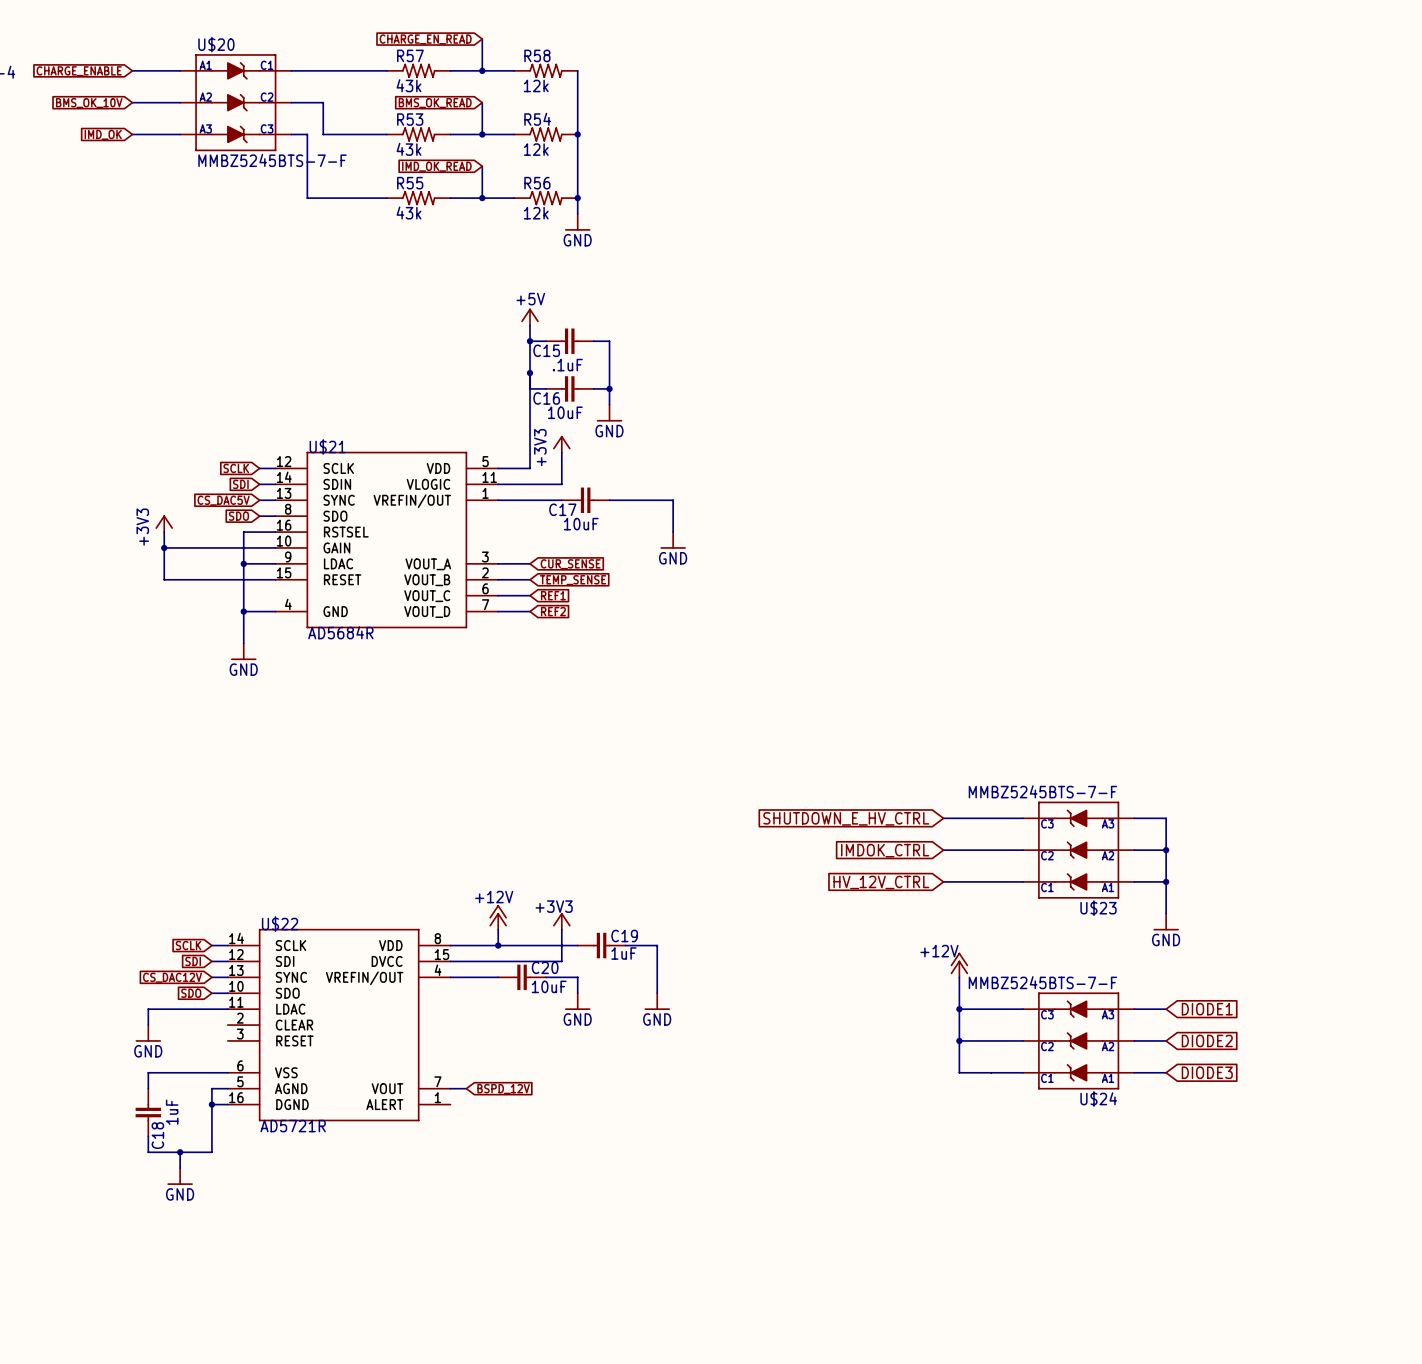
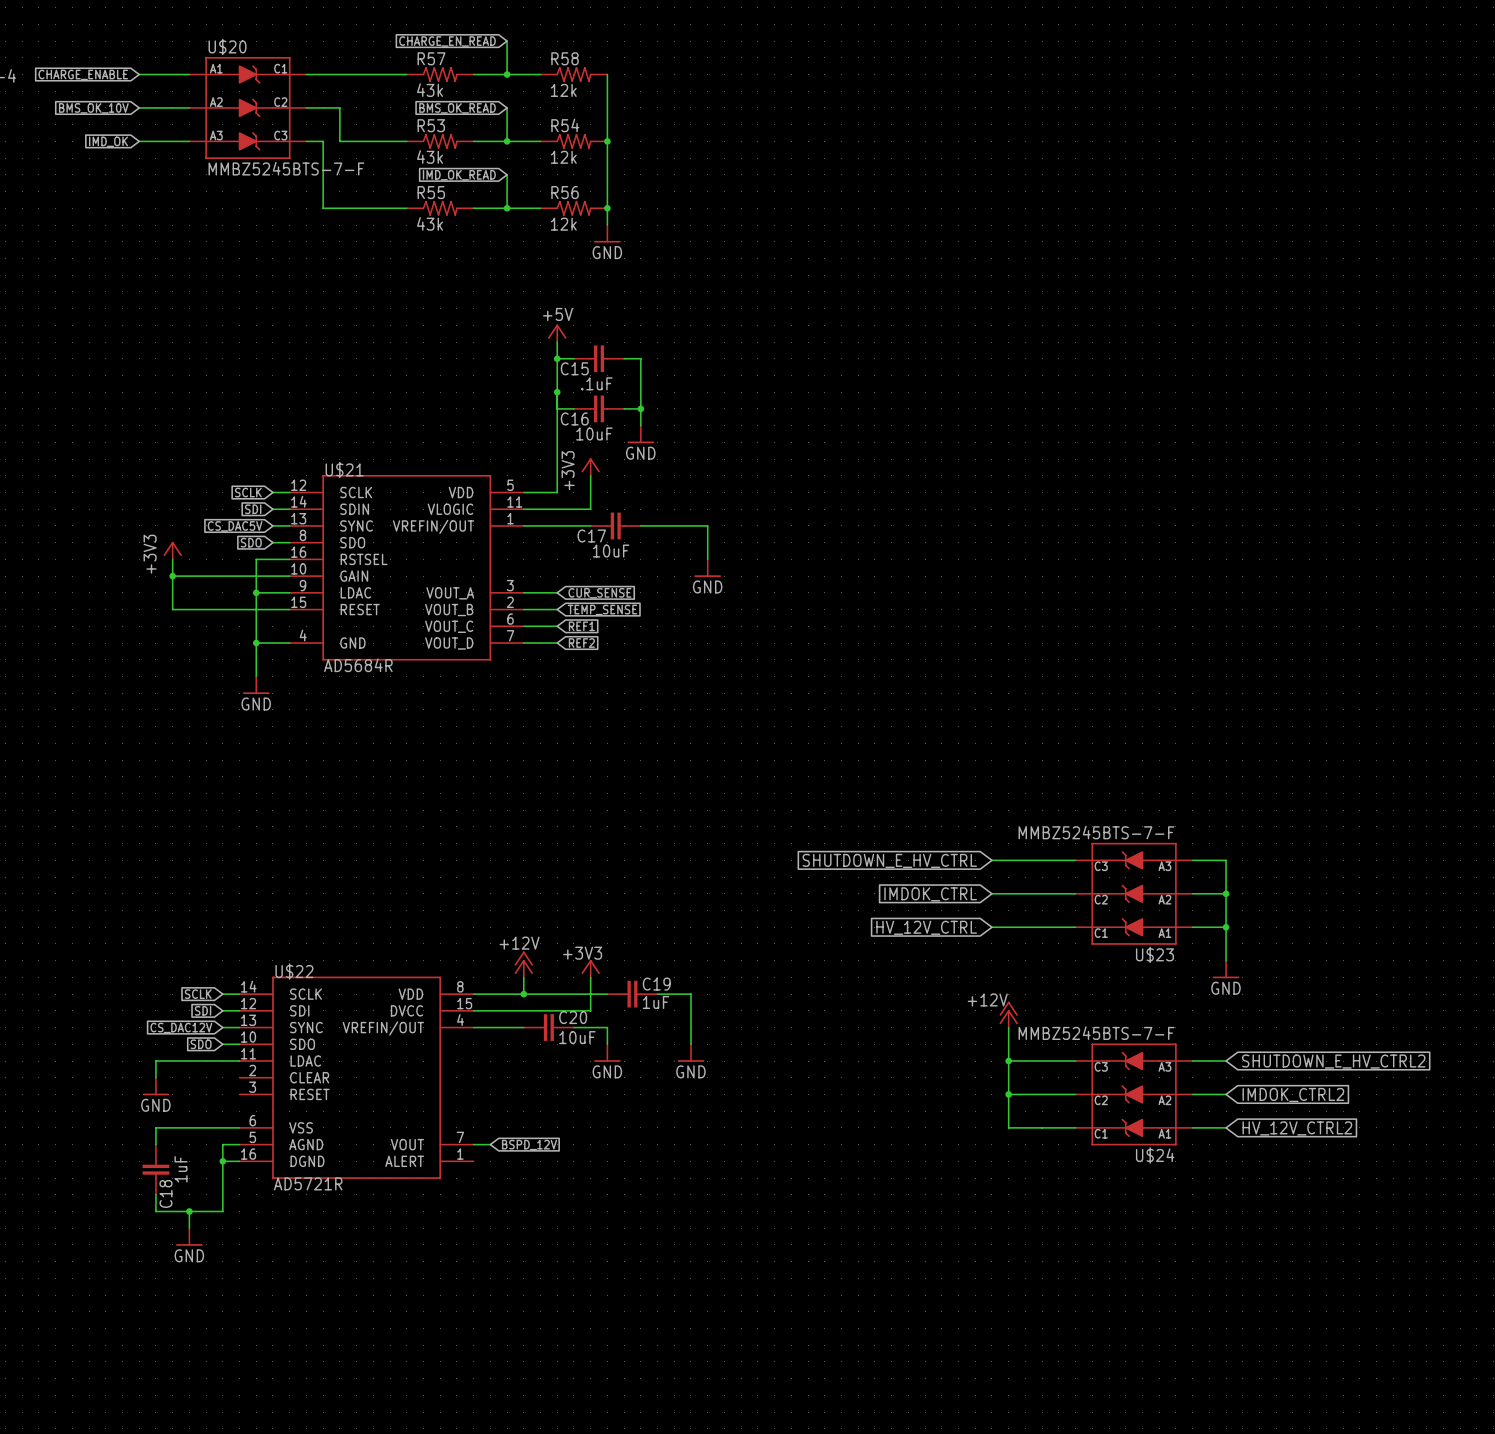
global label: DIODE1 (1207, 1009) -> SHUTDOWN_E_HV_CTRL2 (1333, 1061)
global label: DIODE2 (1207, 1040) -> IMDOK_CTRL2 (1293, 1095)
global label: DIODE3 (1207, 1072) -> HV_12V_CTRL2 (1297, 1128)

